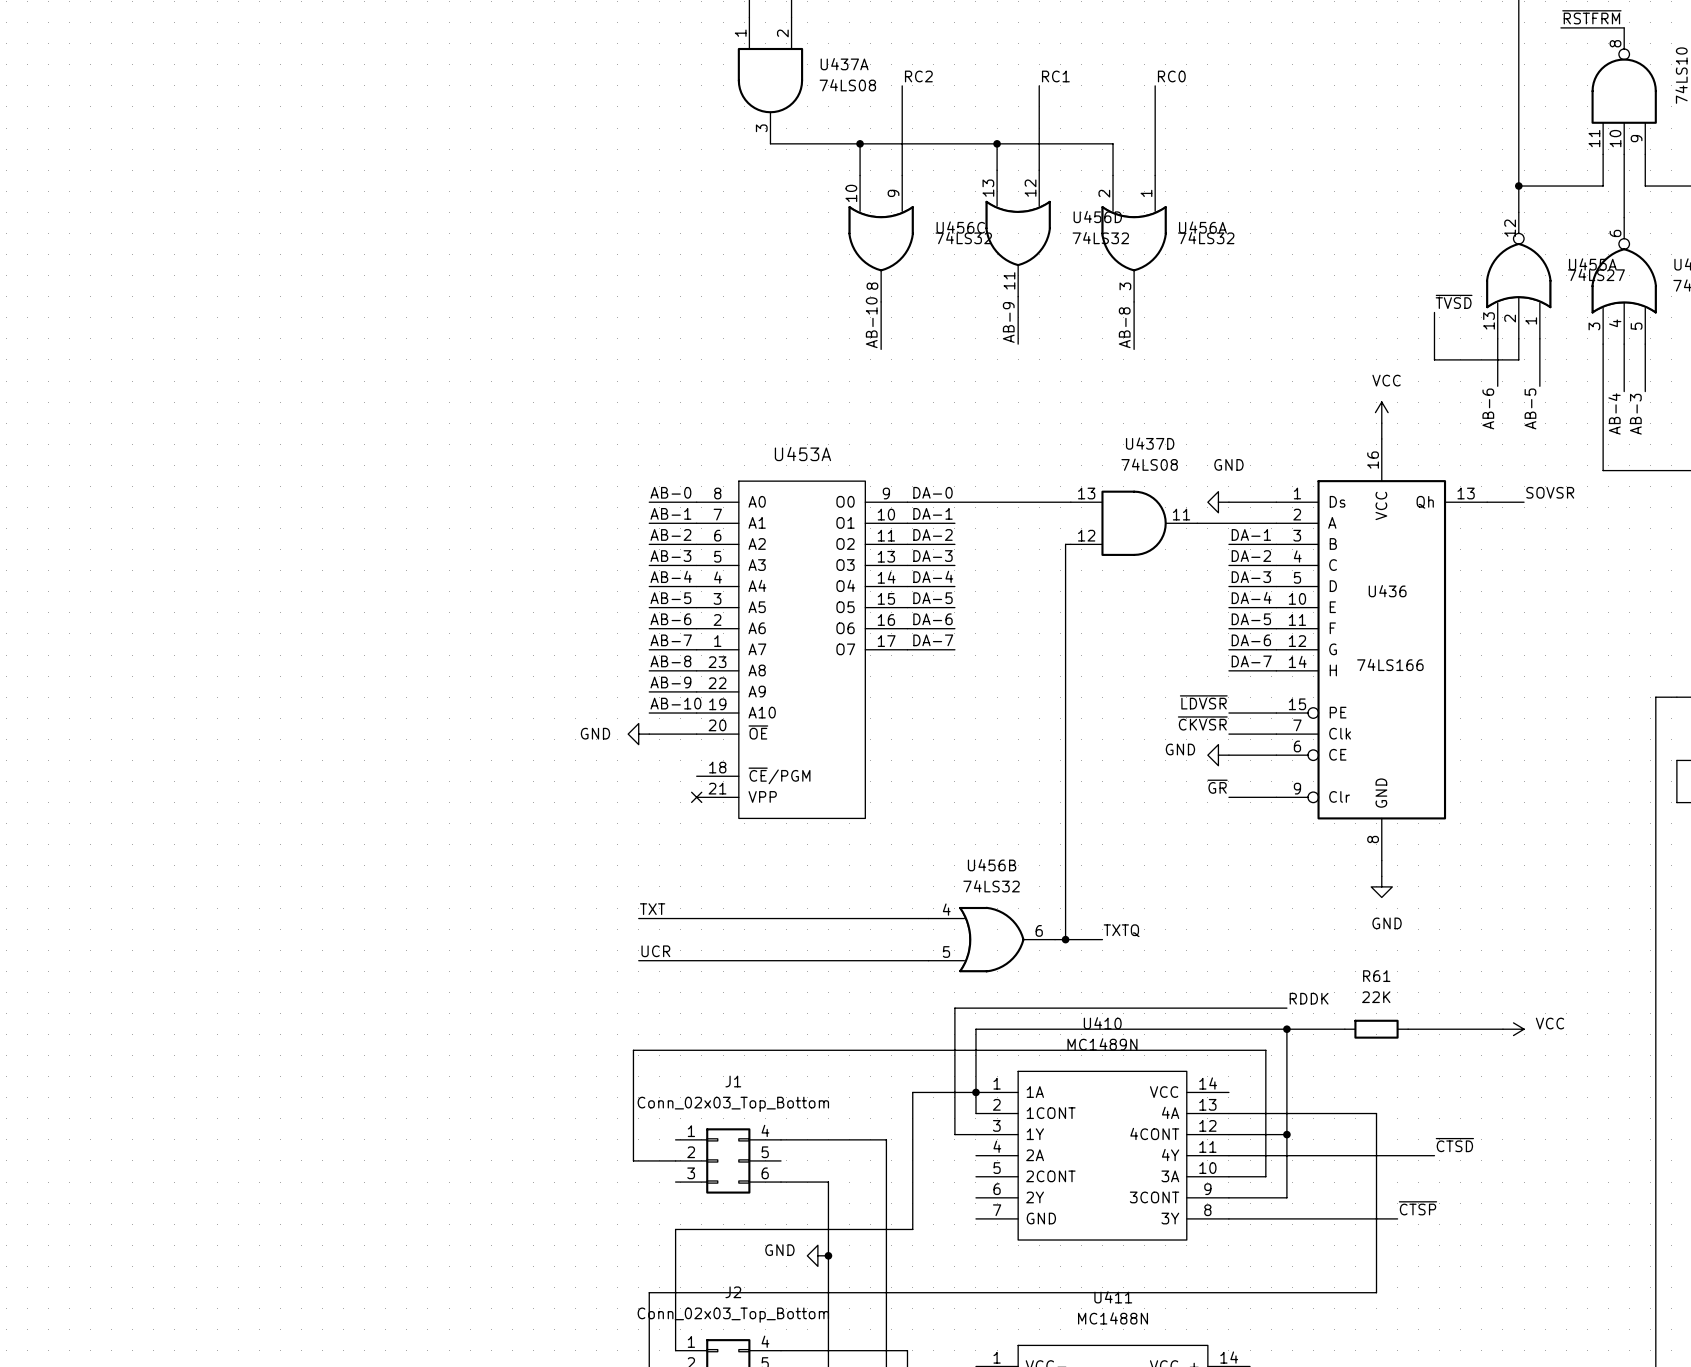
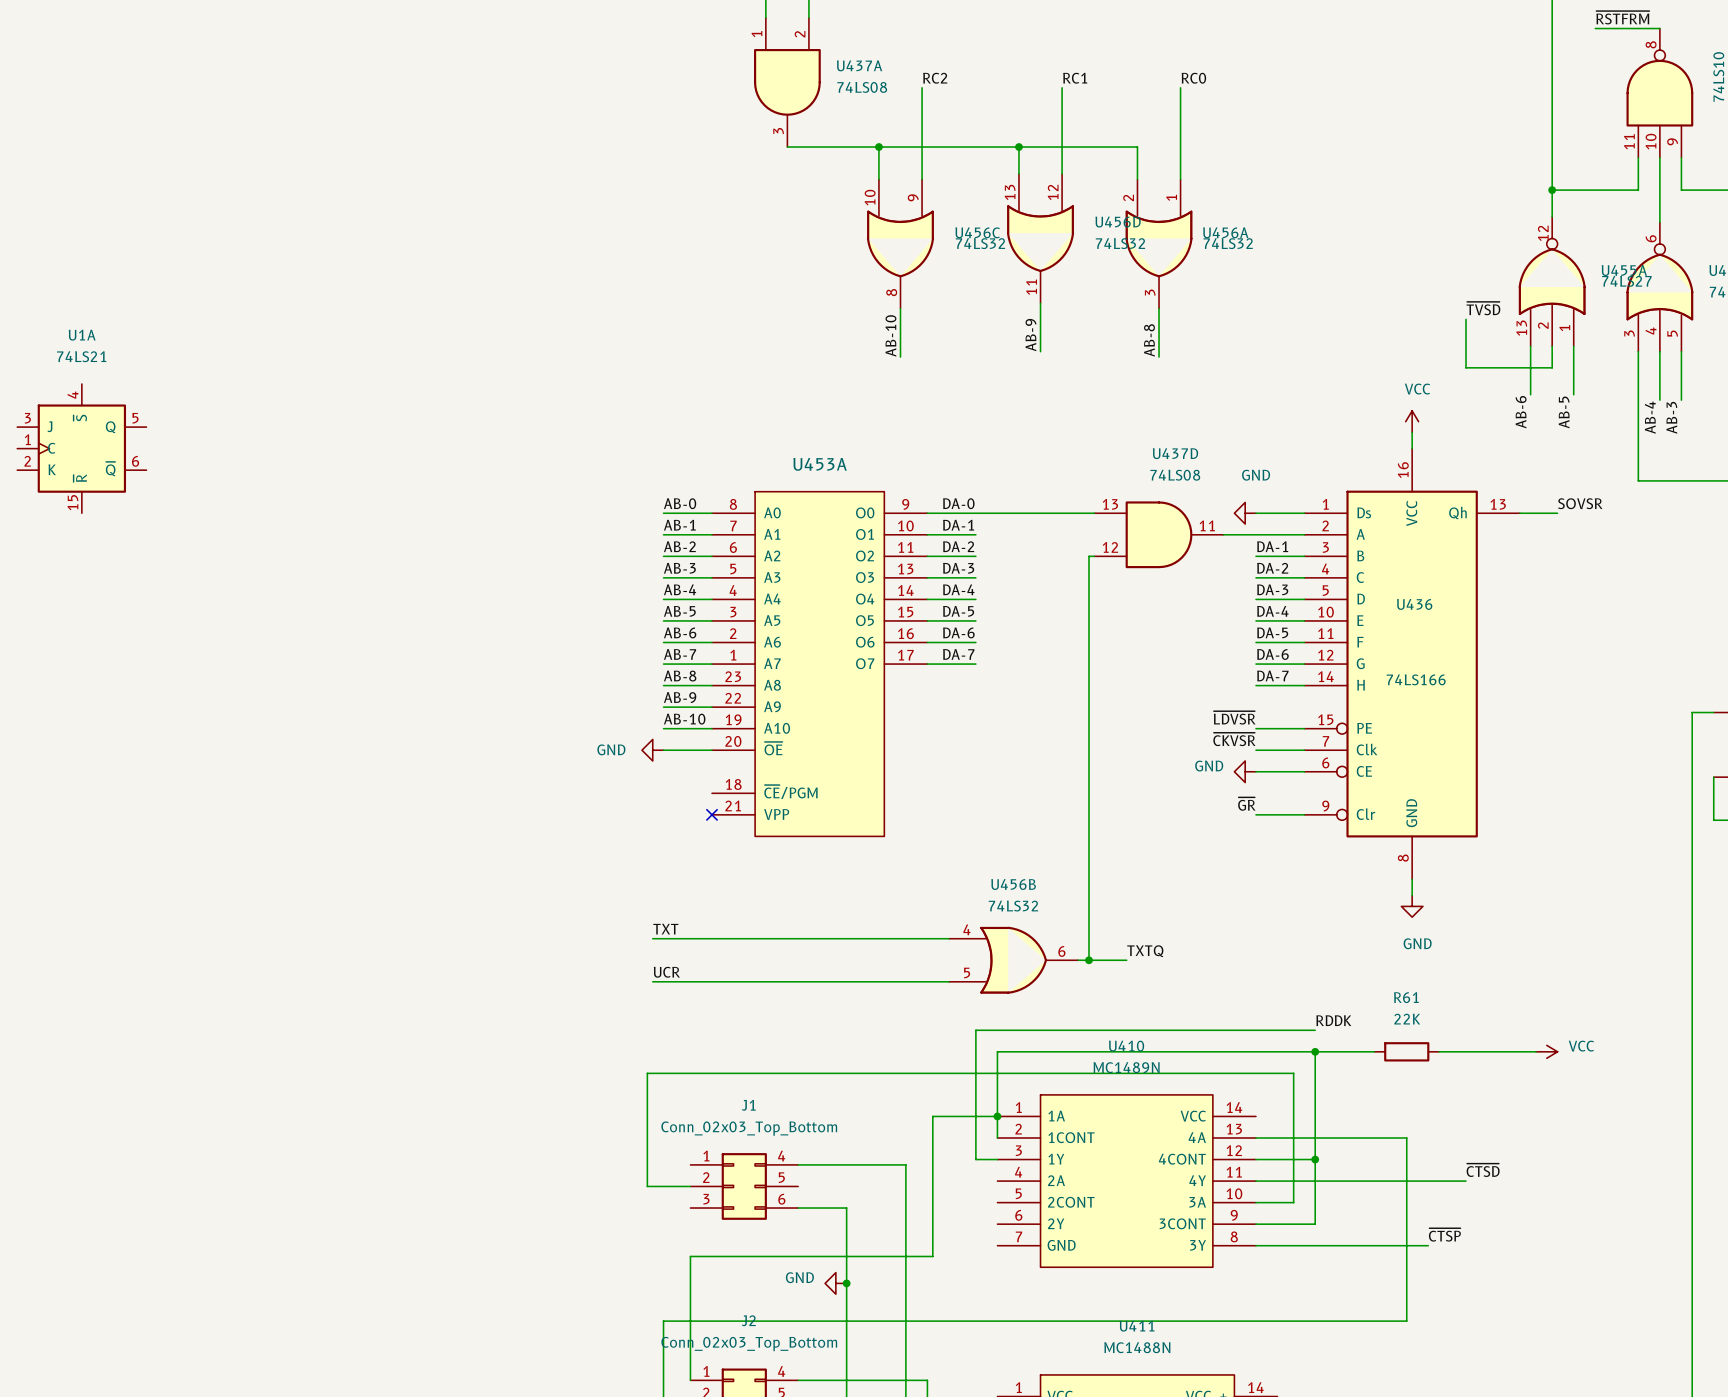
U1A: none -> 74LS21 (81, 448)

